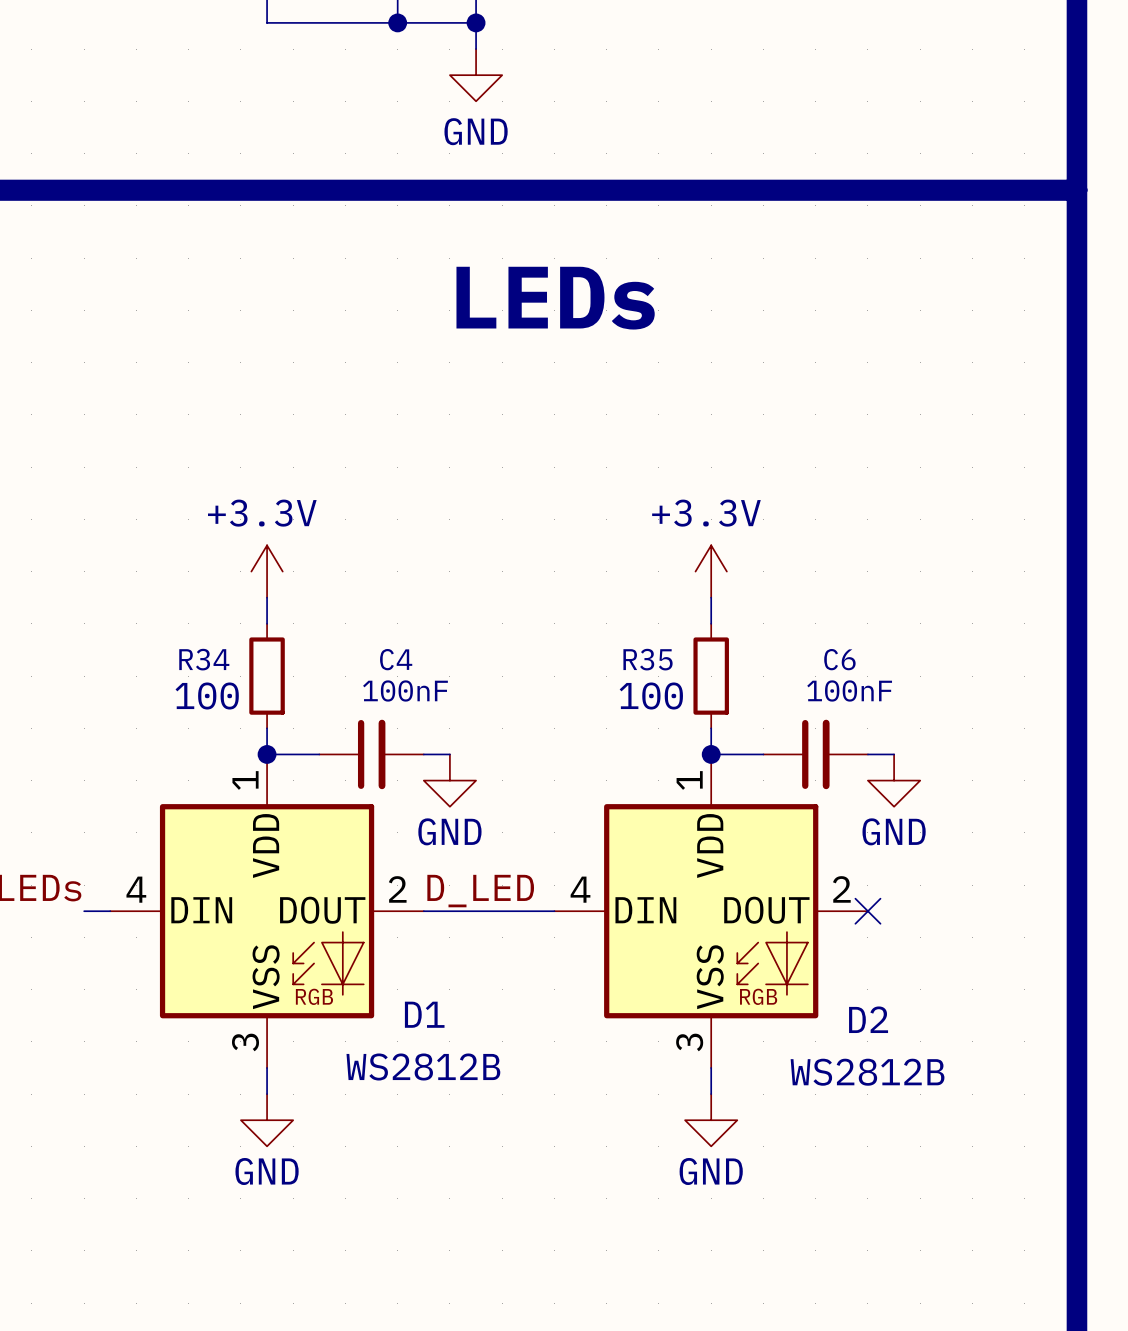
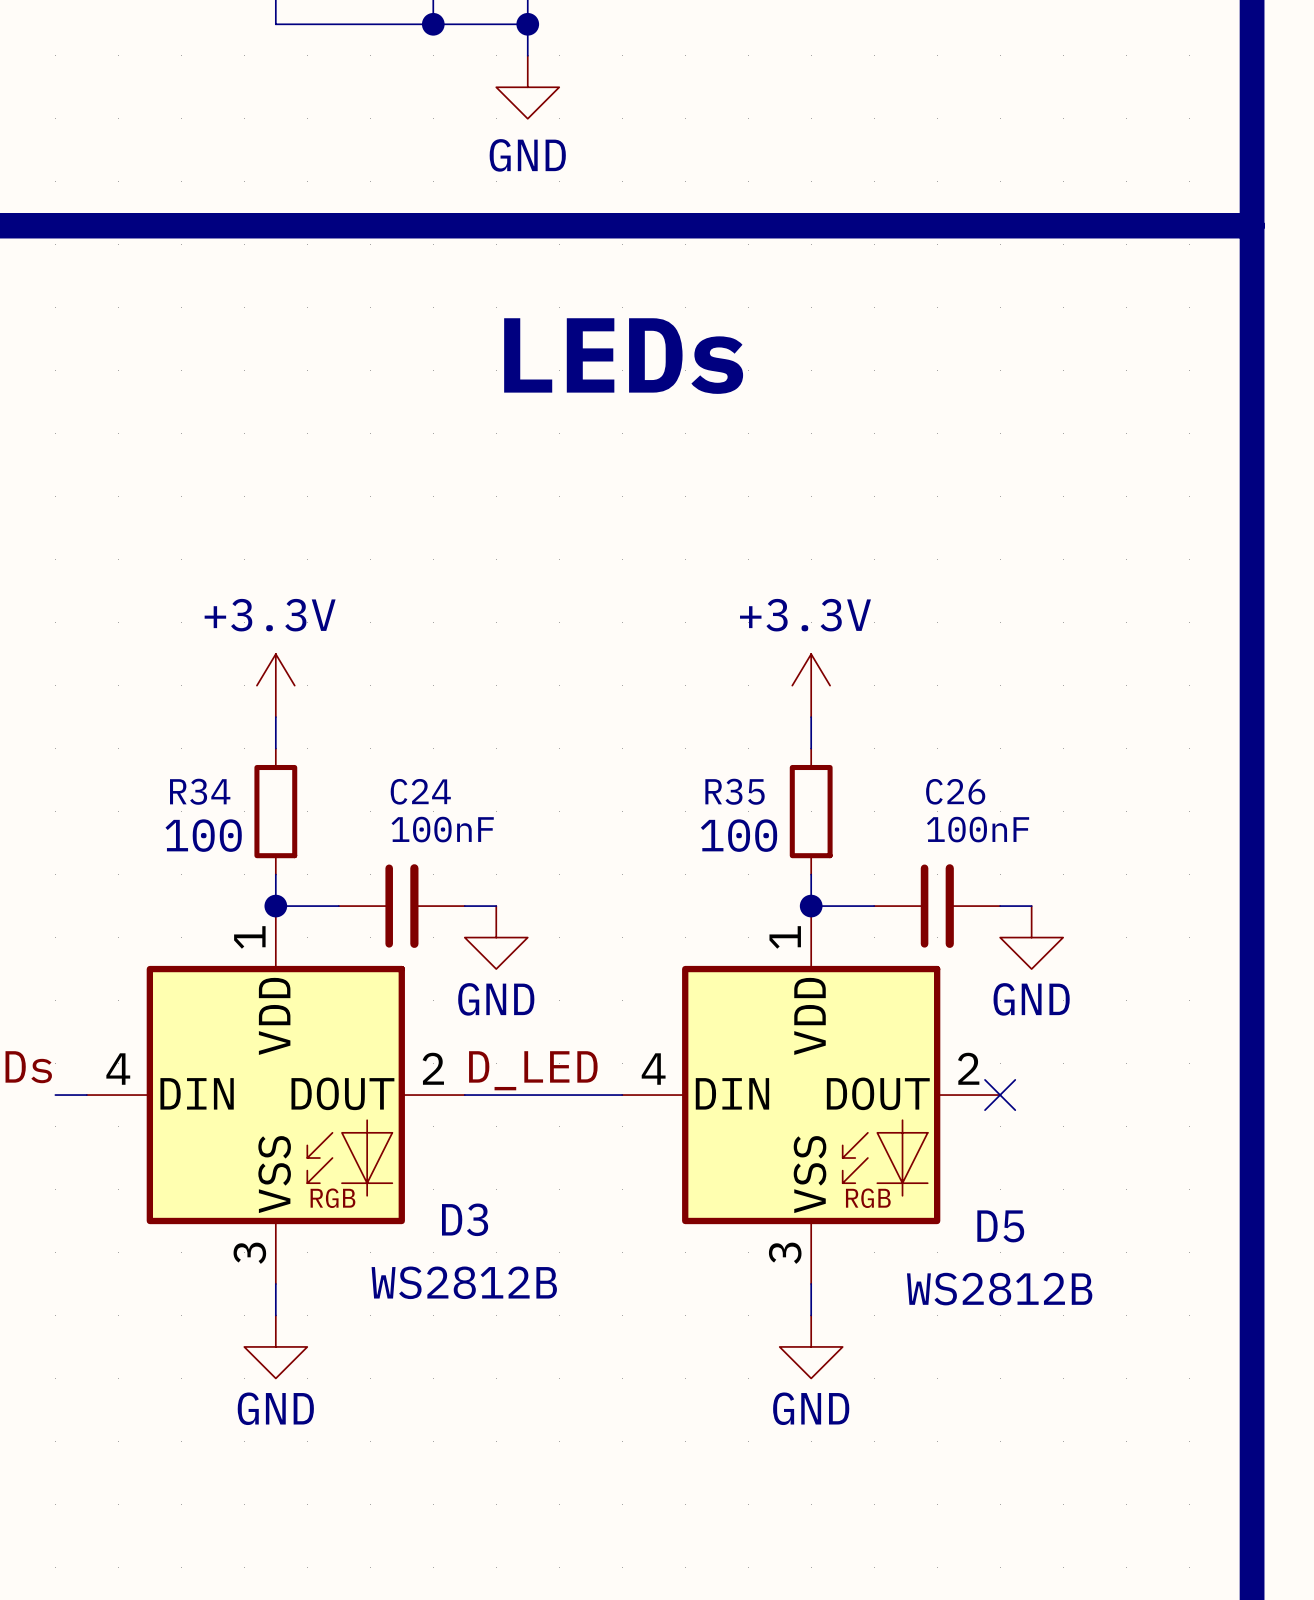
C4 name: C4 (396, 659) -> C24 (420, 791)
C6 name: C6 (839, 659) -> C26 (955, 791)
D1 name: D1 (424, 1014) -> D3 (465, 1219)
D2 name: D2 (868, 1019) -> D5 (1000, 1226)

